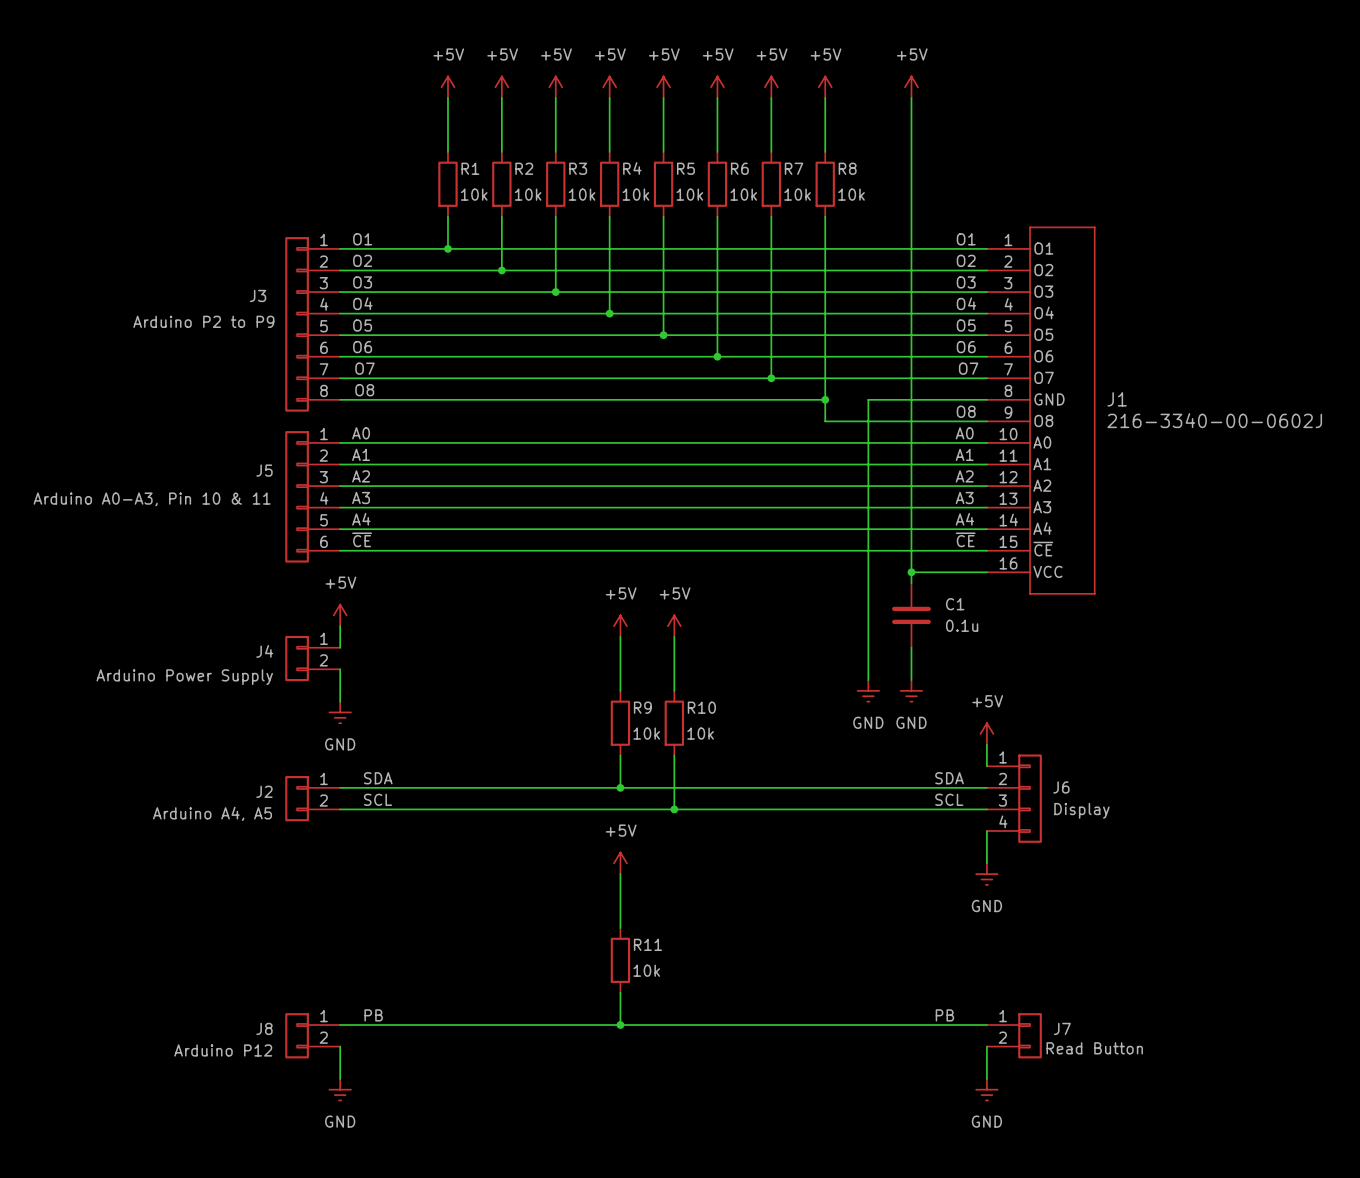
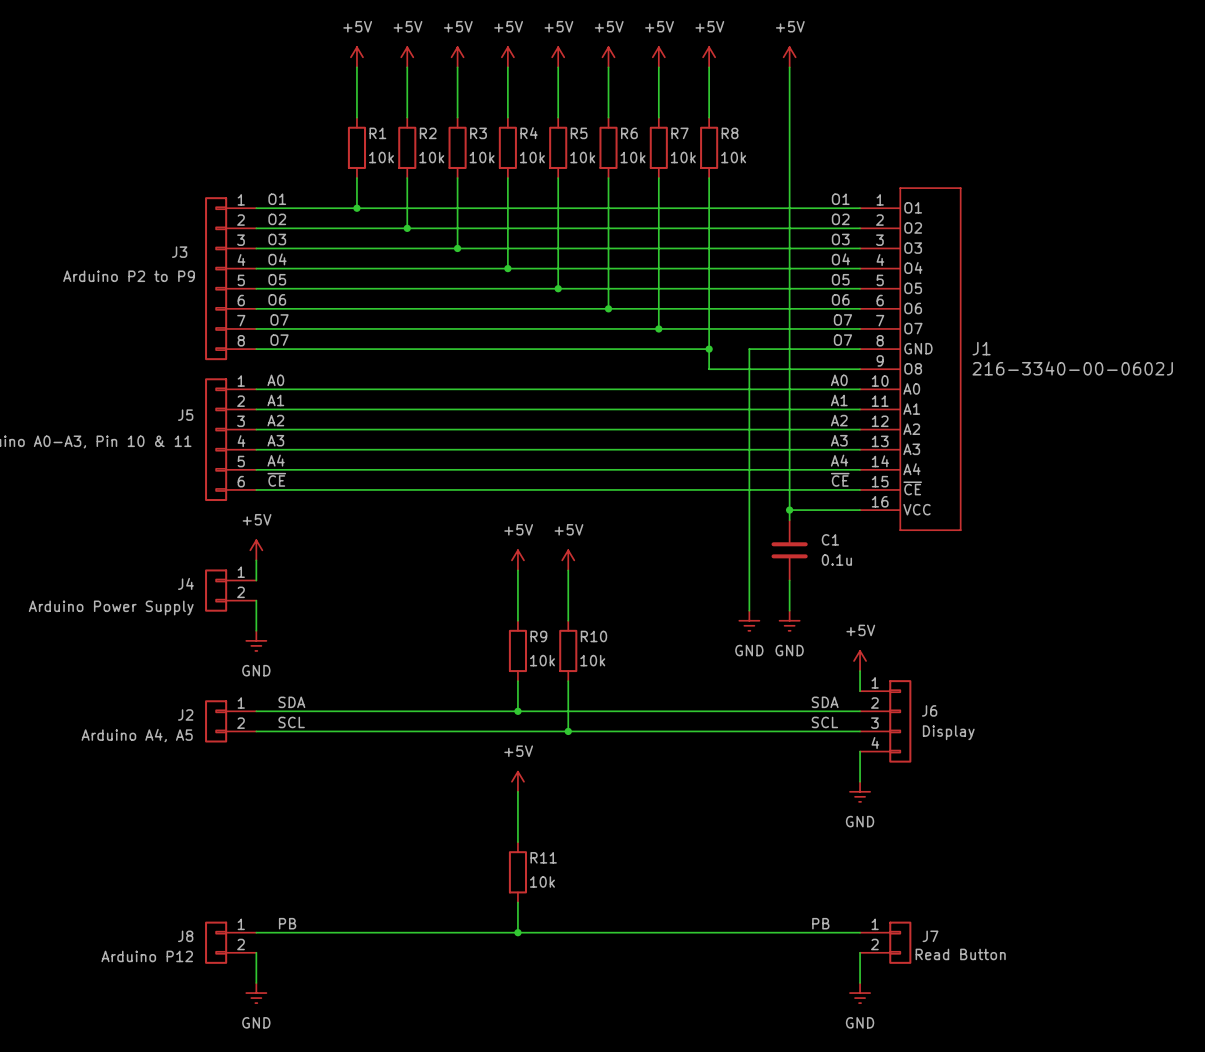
label: O8 (364, 390) -> O7 (279, 340)
label: none -> O7 (842, 340)
label: O8 (966, 411) -> none

